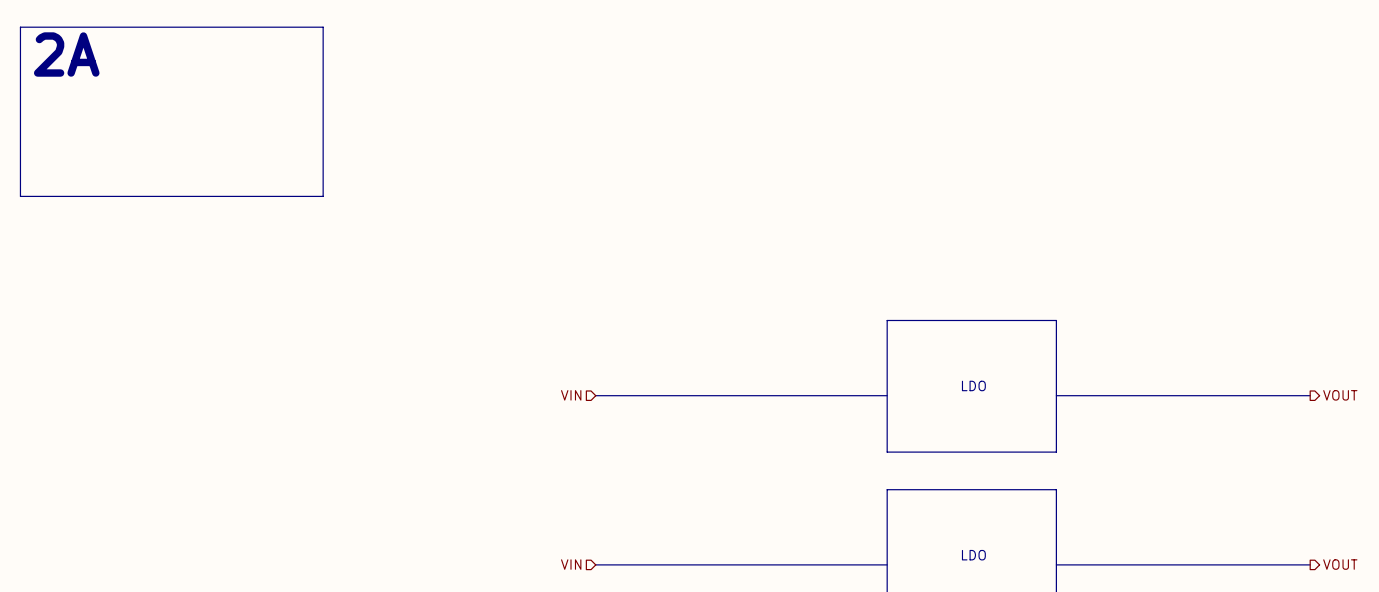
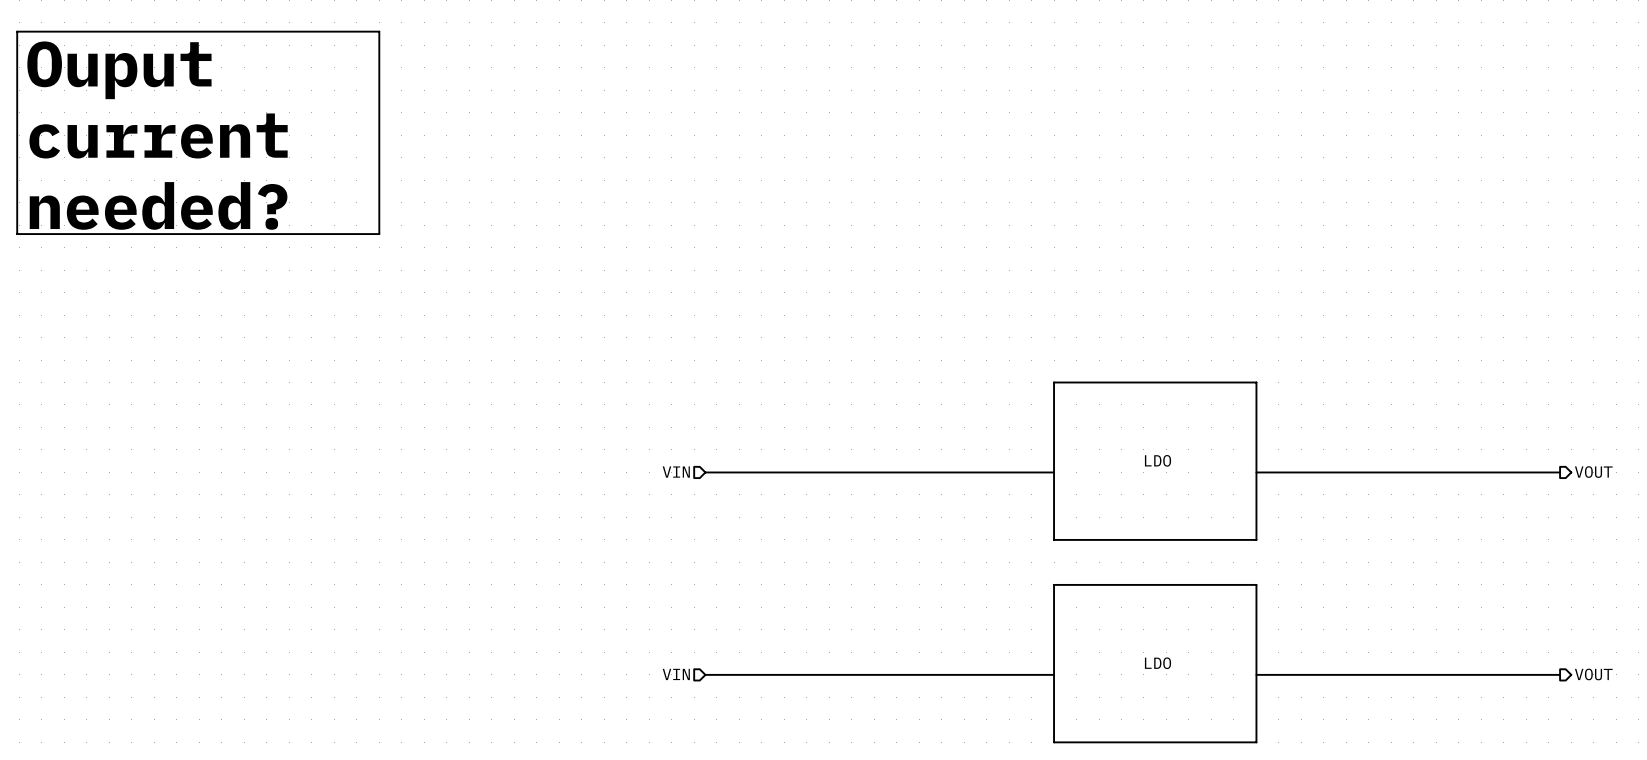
text: 2A (66, 54) -> Ouput (119, 70)
text: none -> current (158, 135)
text: none -> needed? (158, 205)

